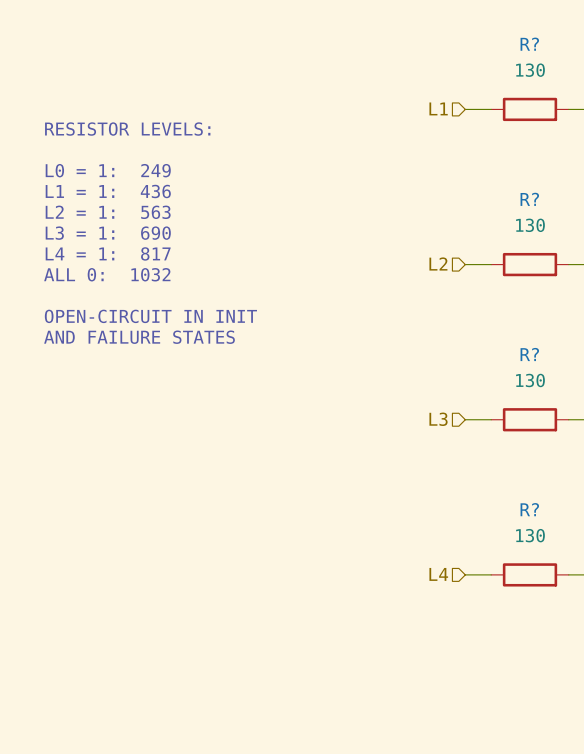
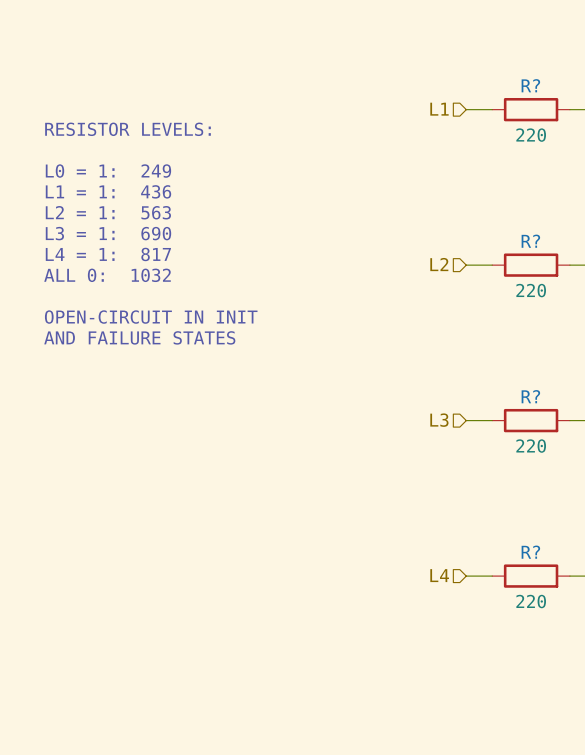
R? name position: R? (529, 44) -> R? (530, 85)
R? value: 130 (530, 70) -> 220 (531, 135)
R? name position: R? (529, 199) -> R? (530, 241)
R? value: 130 (530, 225) -> 220 (531, 290)
R? name position: R? (529, 354) -> R? (530, 396)
R? value: 130 (530, 380) -> 220 (531, 446)
R? name position: R? (529, 509) -> R? (530, 552)
R? value: 130 (530, 535) -> 220 (531, 601)

